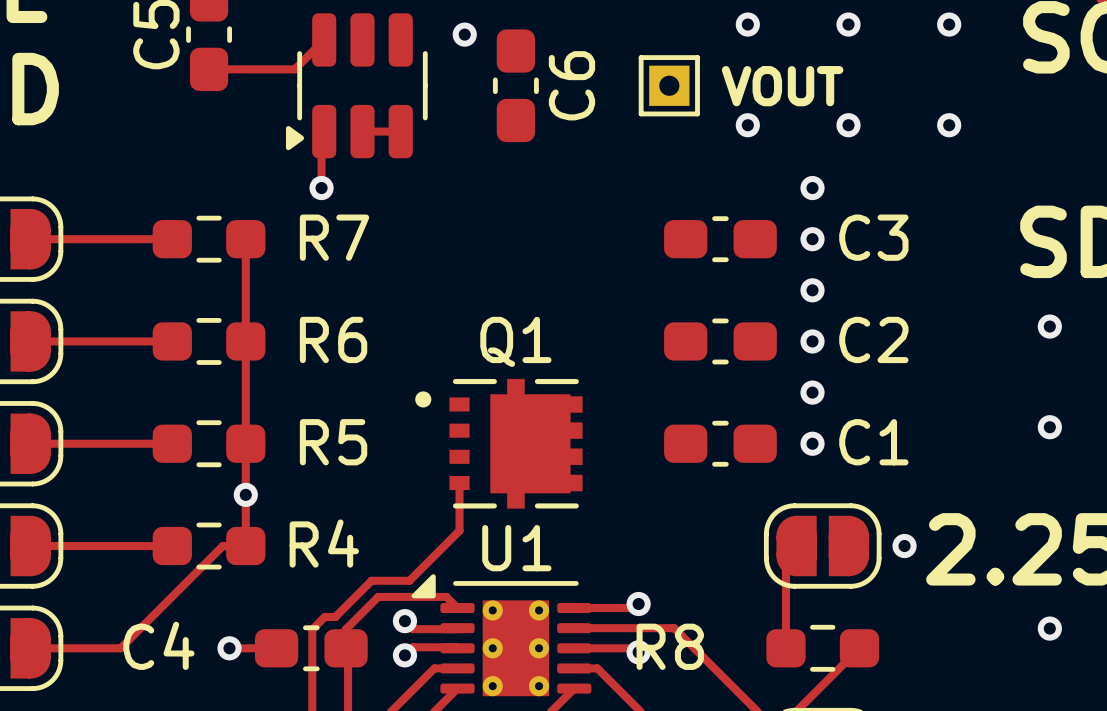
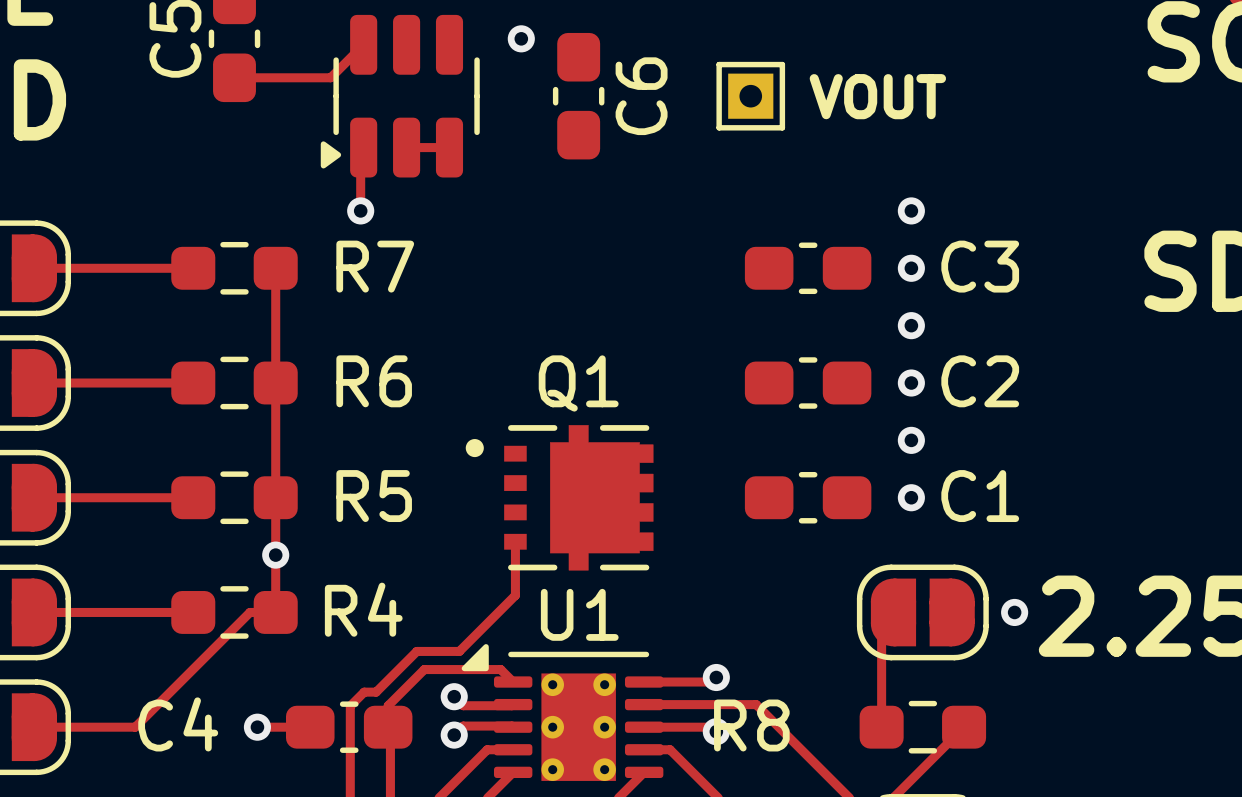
via: (747, 24) -> none
via: (848, 24) -> none
via: (949, 24) -> none
via: (747, 125) -> none
via: (848, 125) -> none
via: (949, 125) -> none
via: (1049, 326) -> none
via: (1049, 427) -> none
via: (1049, 628) -> none

